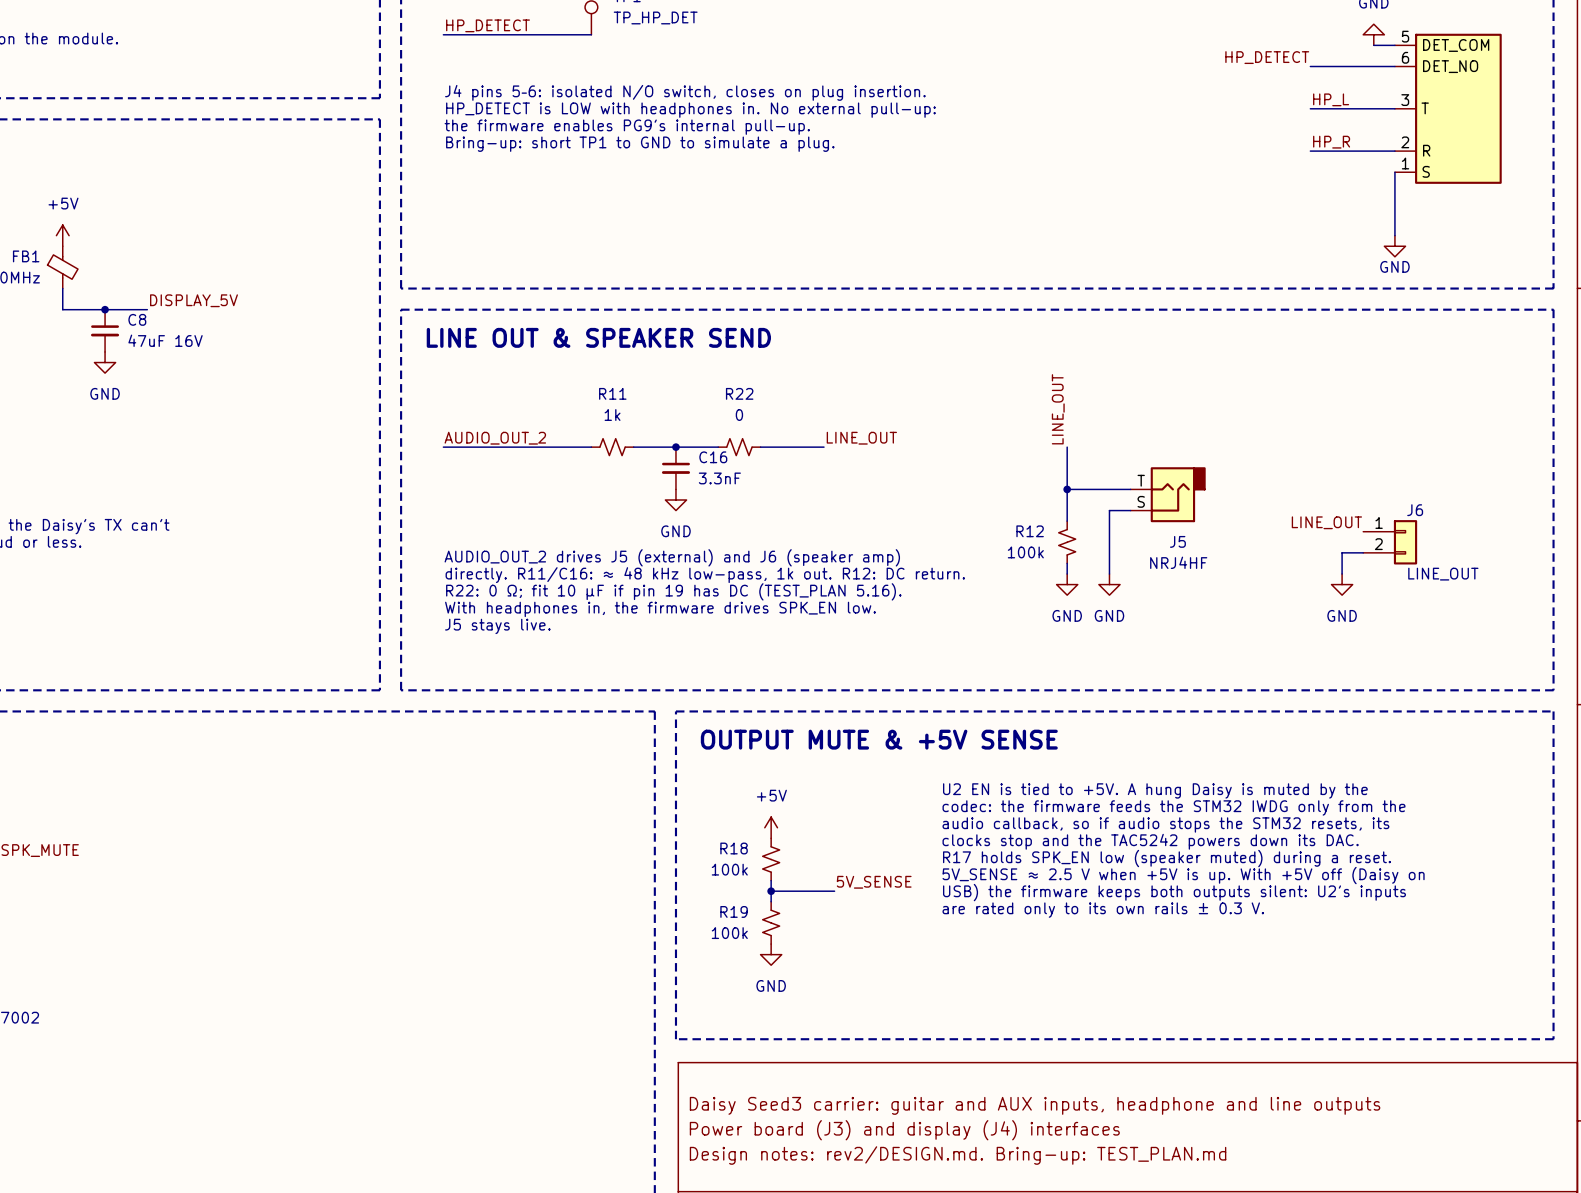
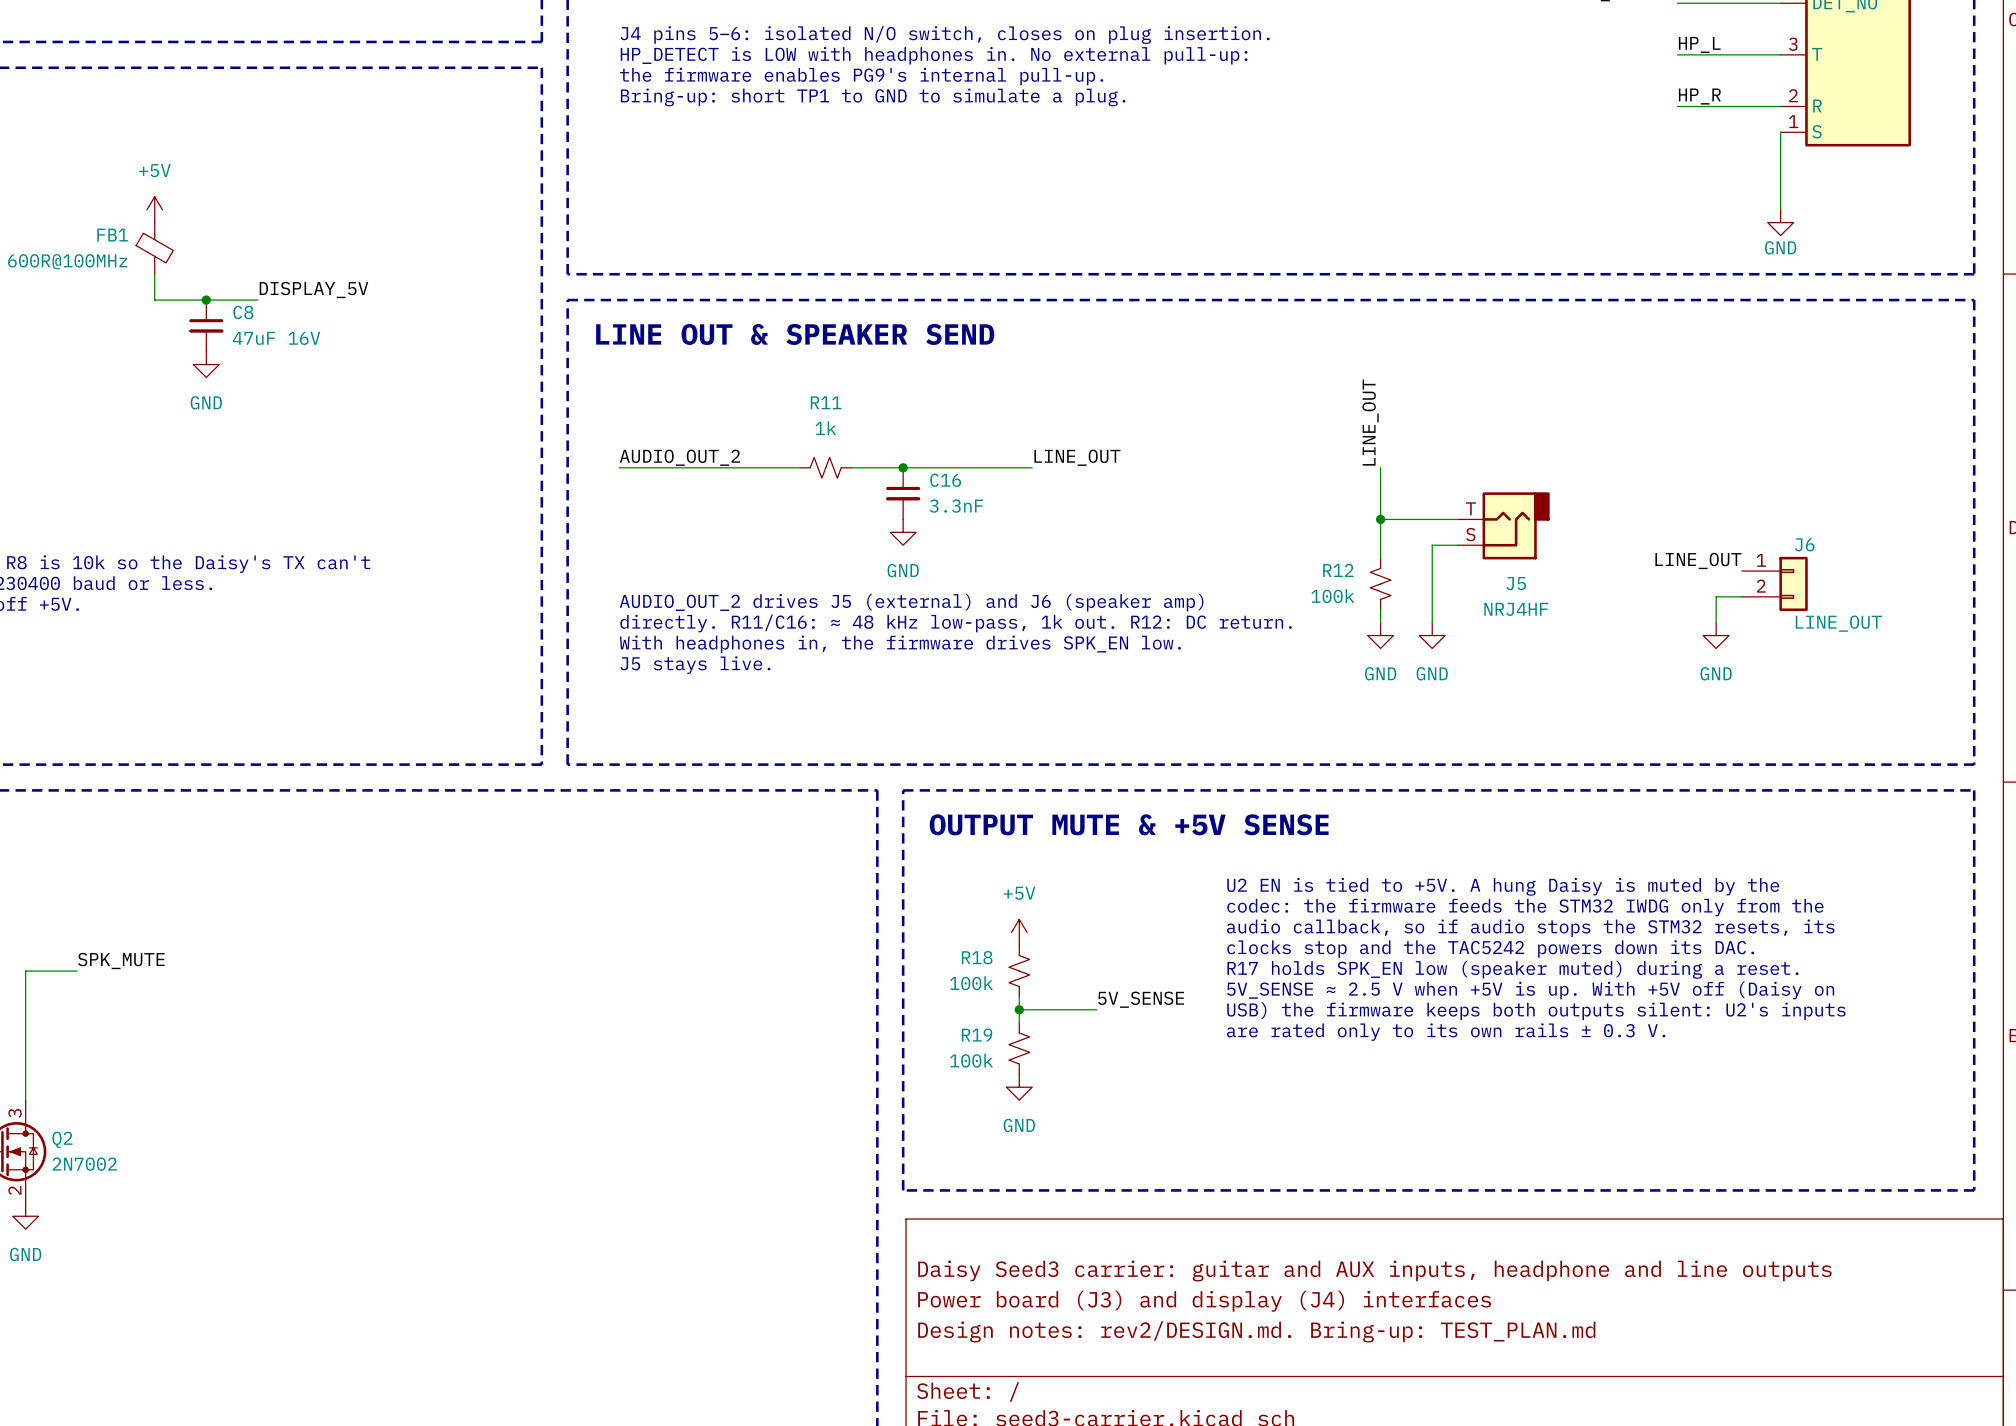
label position: LINE_OUT (861, 438) -> LINE_OUT (1077, 457)
R22: 0 (739, 447) -> none
wire: (781, 447) (824, 447) -> (954, 467) (1006, 467)
text: R22: 0 Ω; fit 10 µF if pin 19 has DC (TEST_PLAN 5.16). (673, 591) -> With headphones in, the firmware drives SPK_EN low. (900, 644)
text: With headphones in, the firmware drives SPK_EN low. (660, 609) -> J5 stays live. (695, 665)
text: J5 stays live. (497, 626) -> none

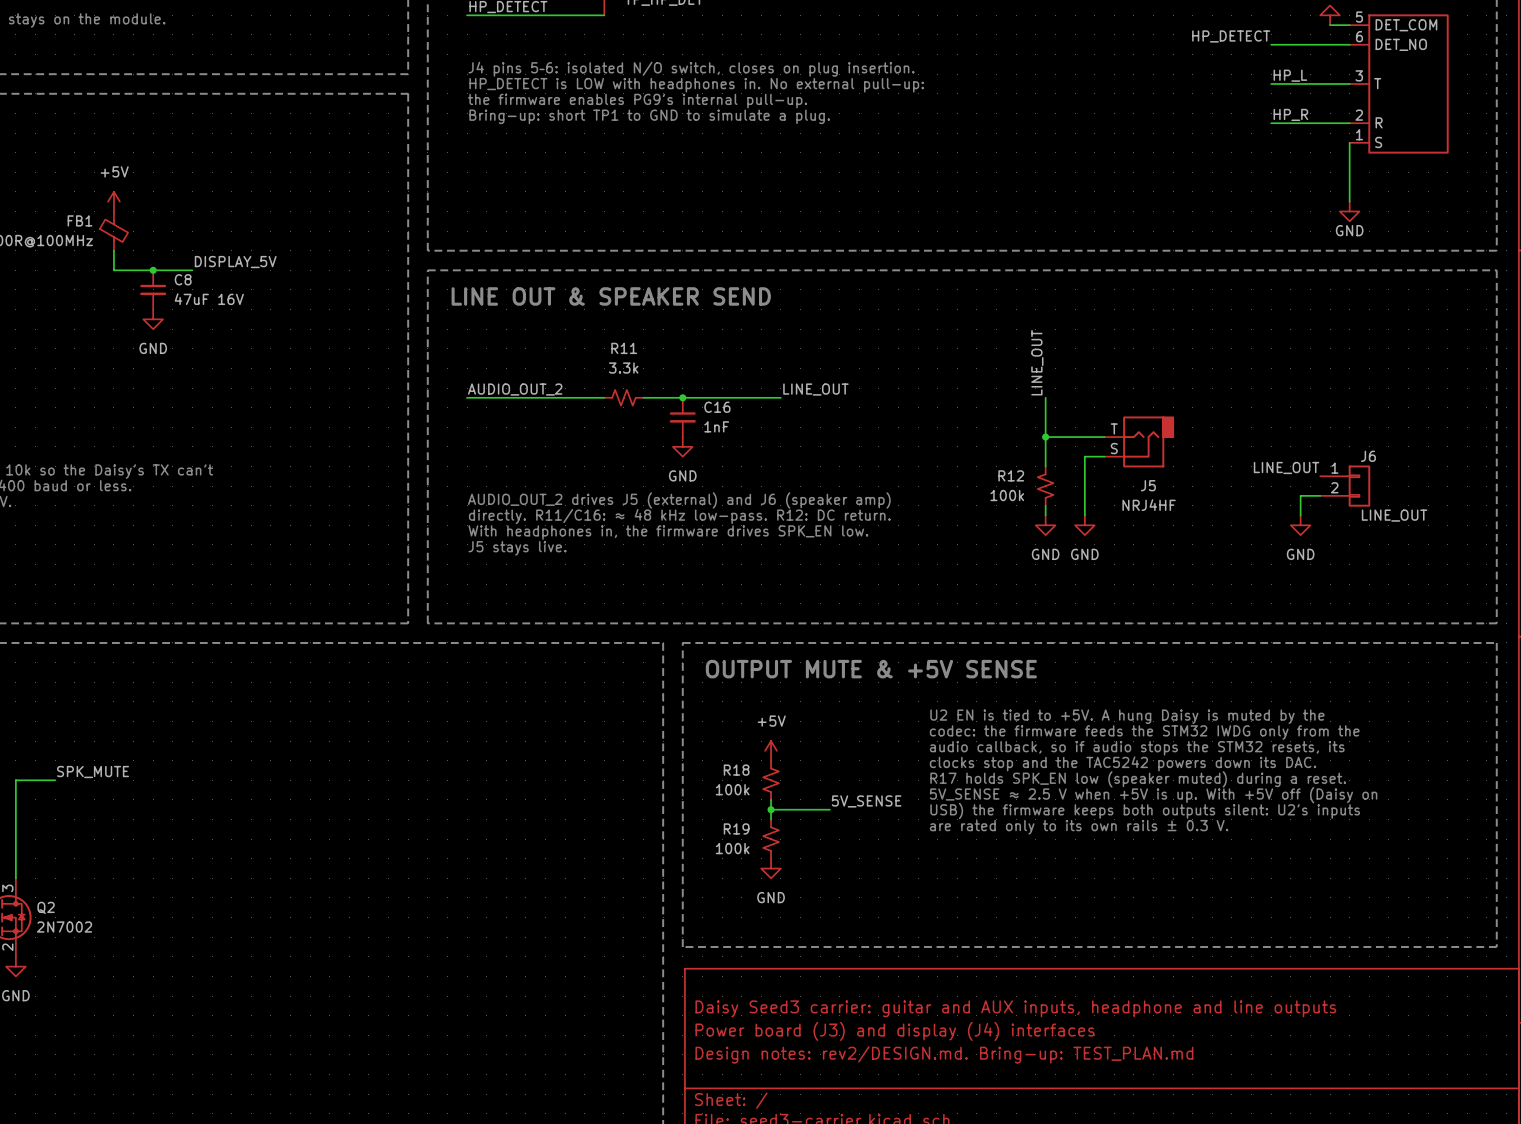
R11 value: 1k (825, 428) -> 3.3k (623, 368)
C16 value: 3.3nF (956, 506) -> 1nF (716, 426)
text: directly. R11/C16: ≈ 48 kHz low-pass, 1k out. R12: DC return. (956, 623) -> directly. R11/C16: ≈ 48 kHz low-pass. R12: DC return. (679, 516)

